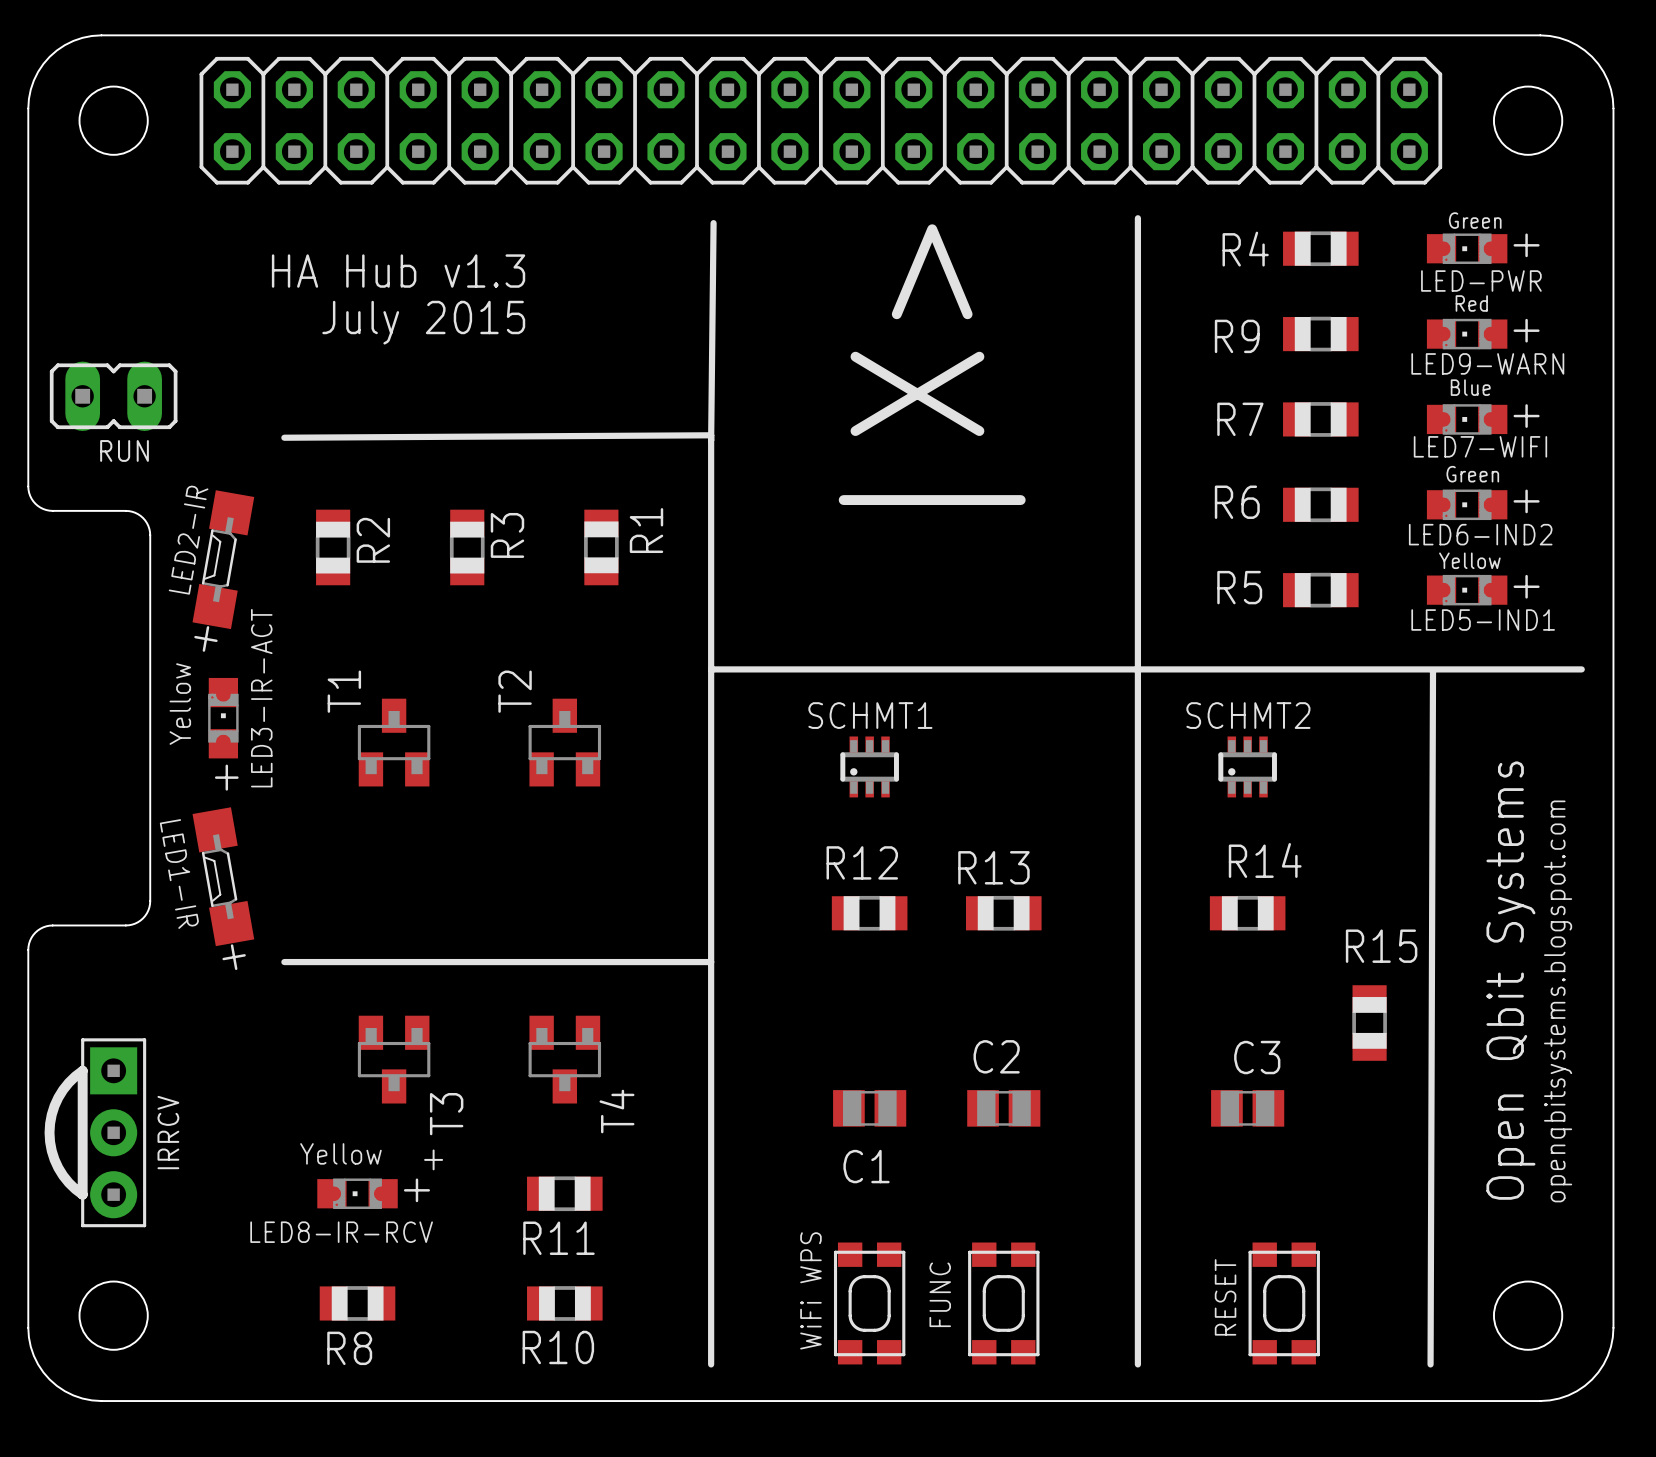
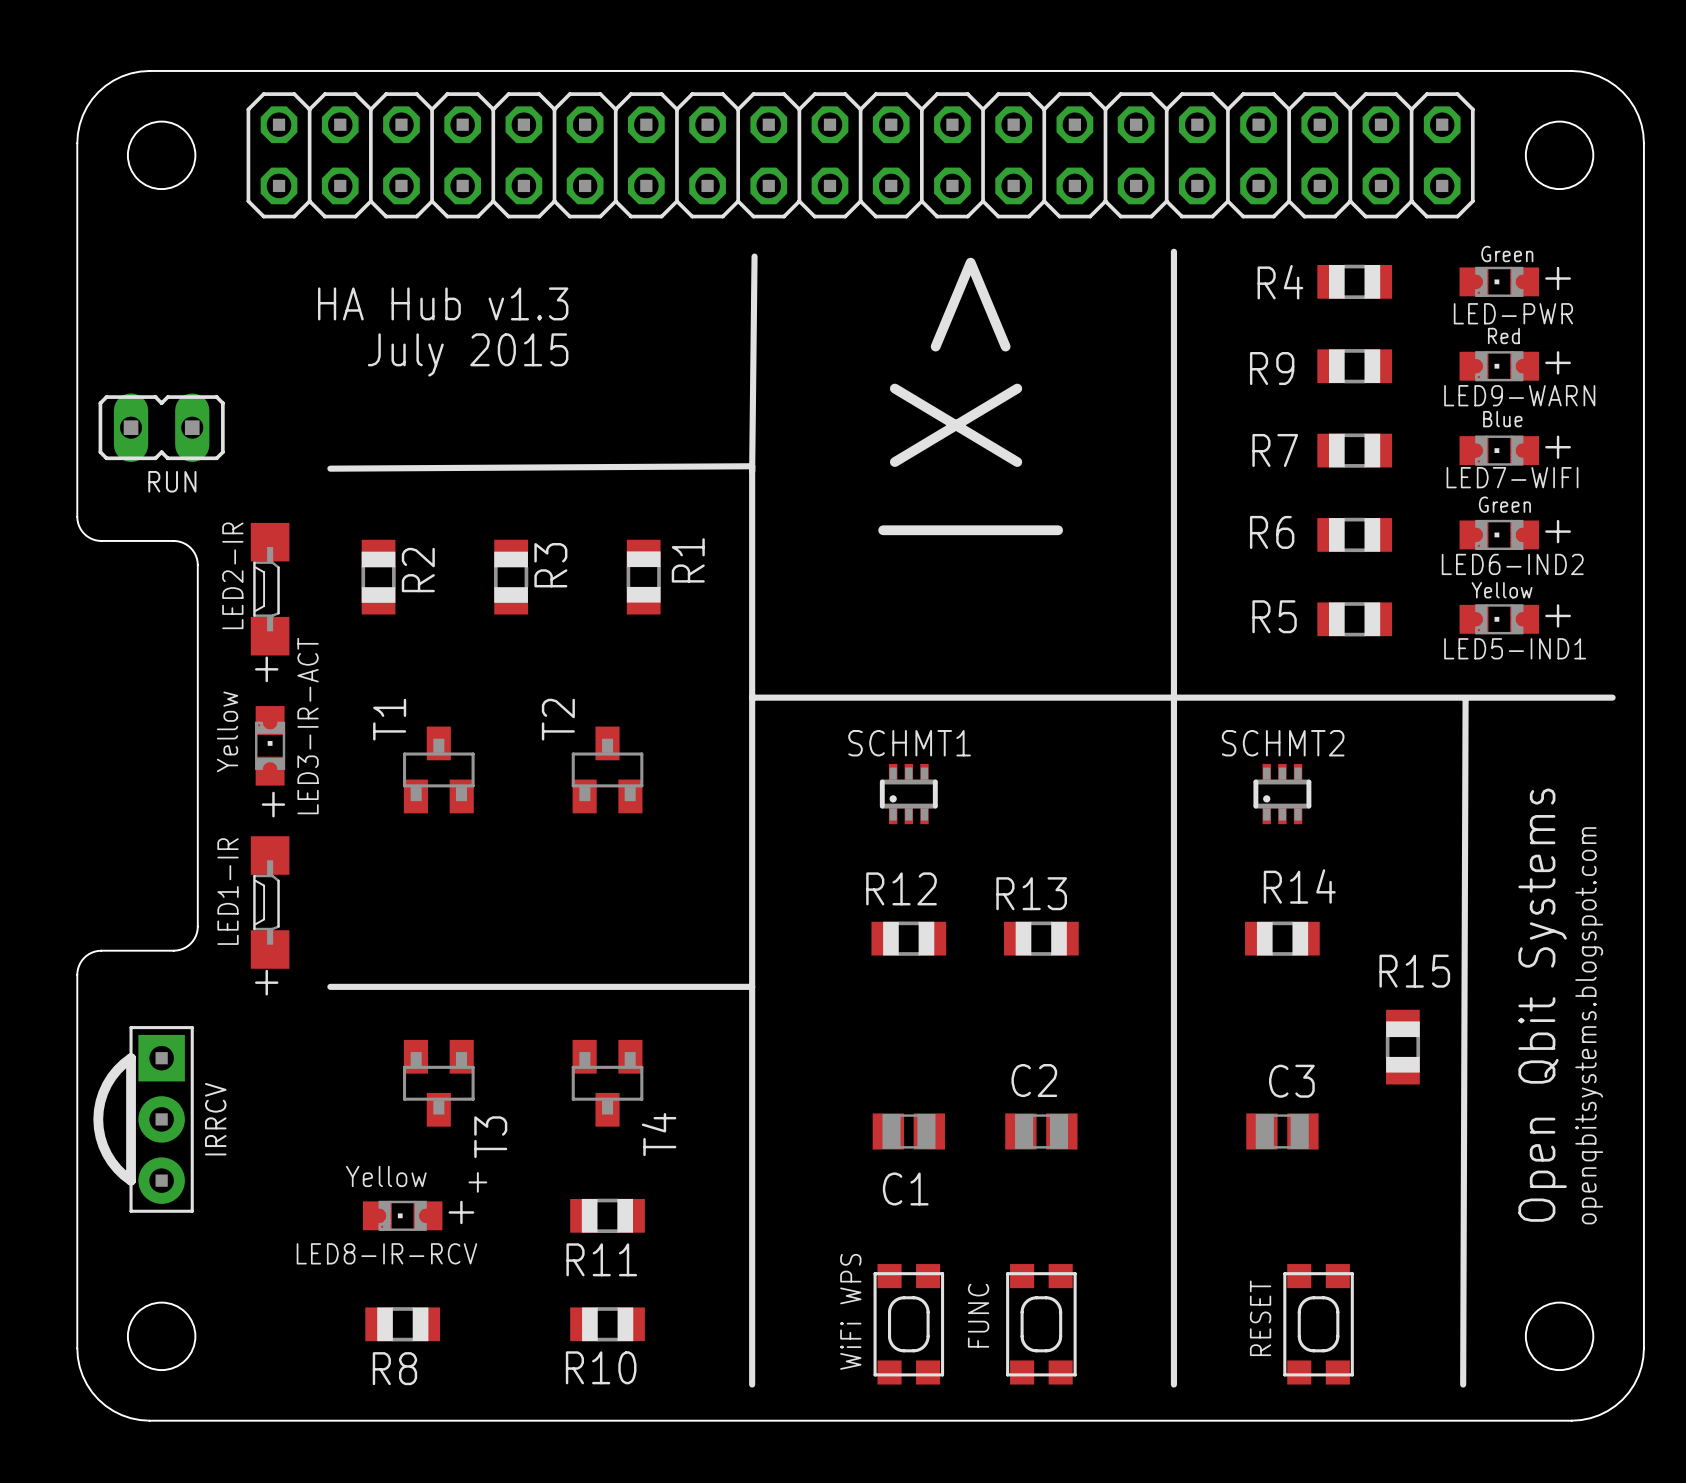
LED2-IR rotation: 0° (223, 559) -> 10° counterclockwise (270, 589)
LED1-IR rotation: 0° (223, 876) -> 10° clockwise (270, 902)
IRRCV position: (95, 1132) -> (143, 1119)

